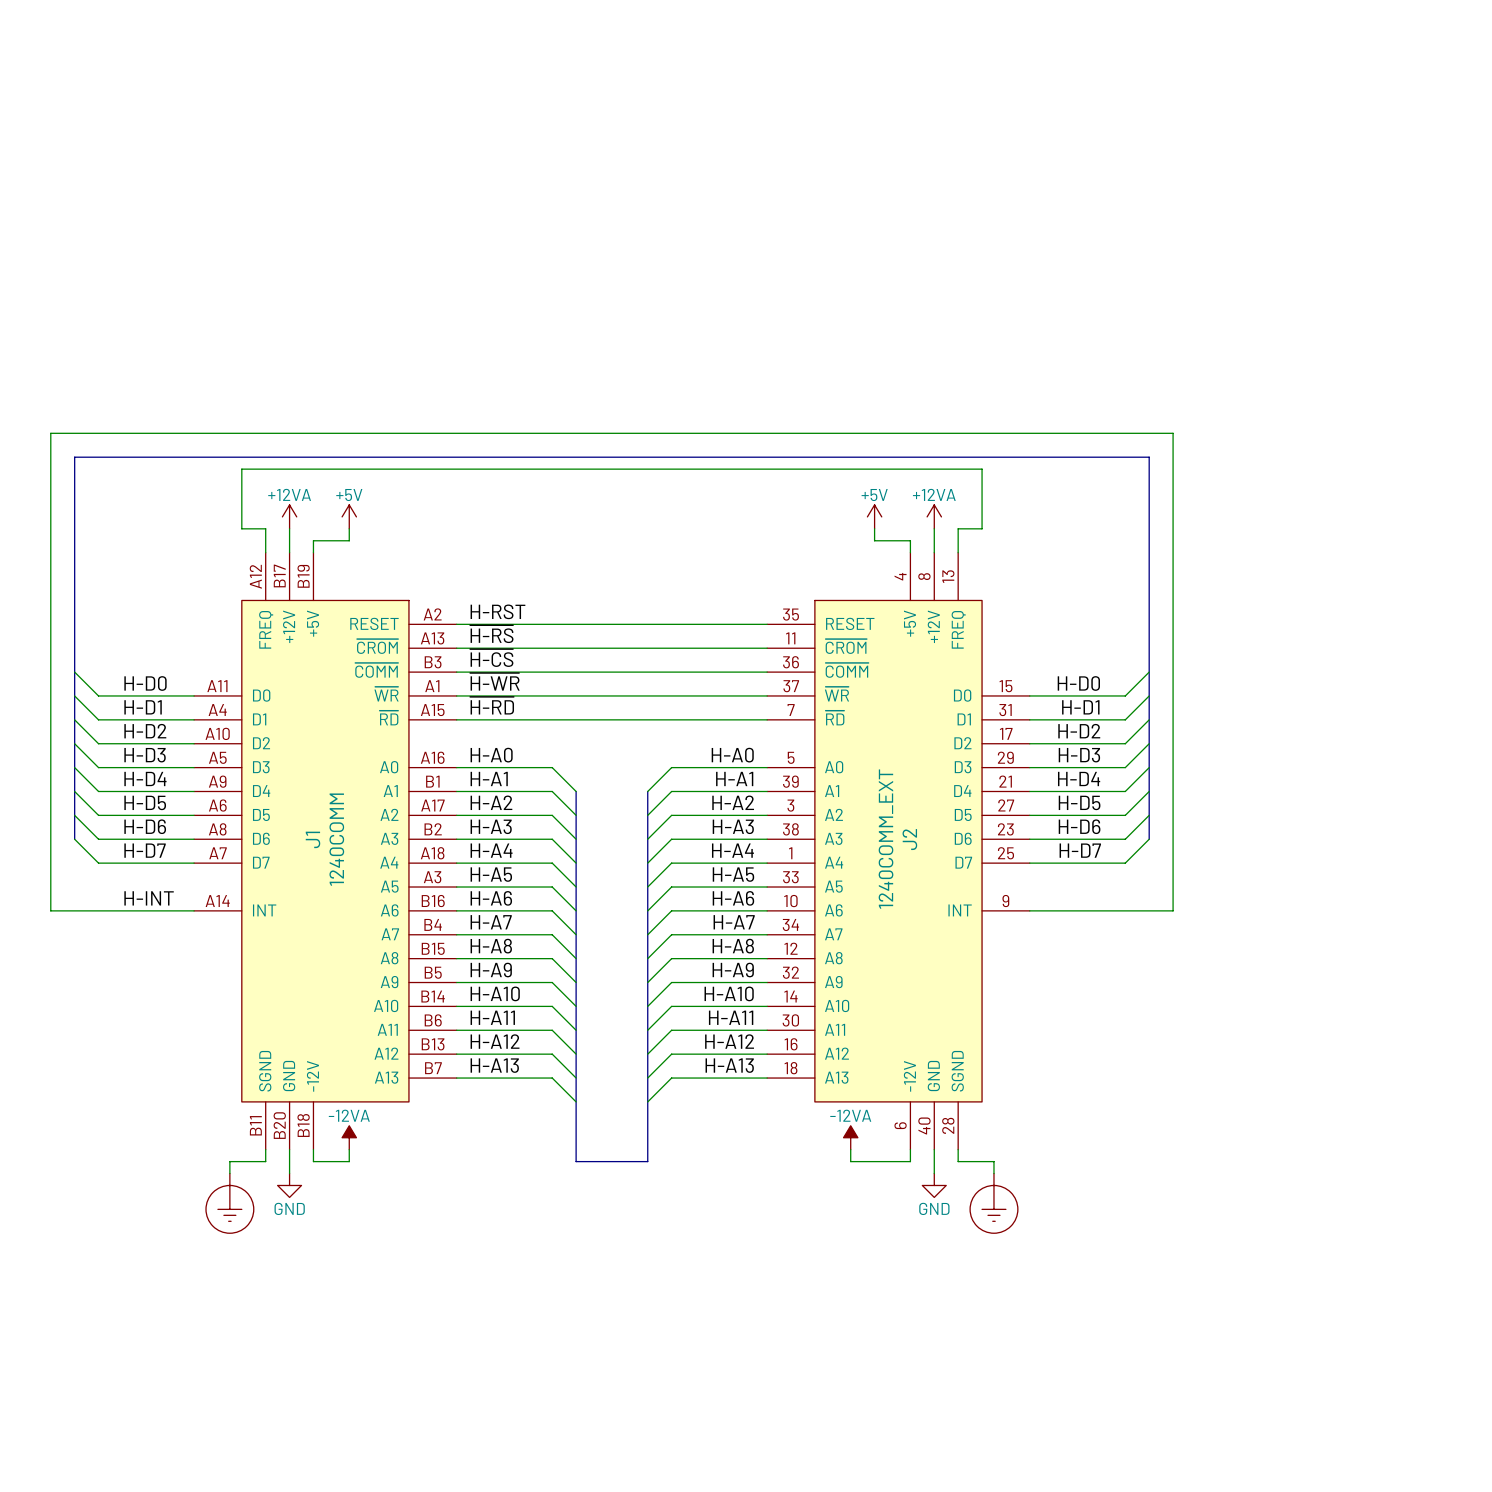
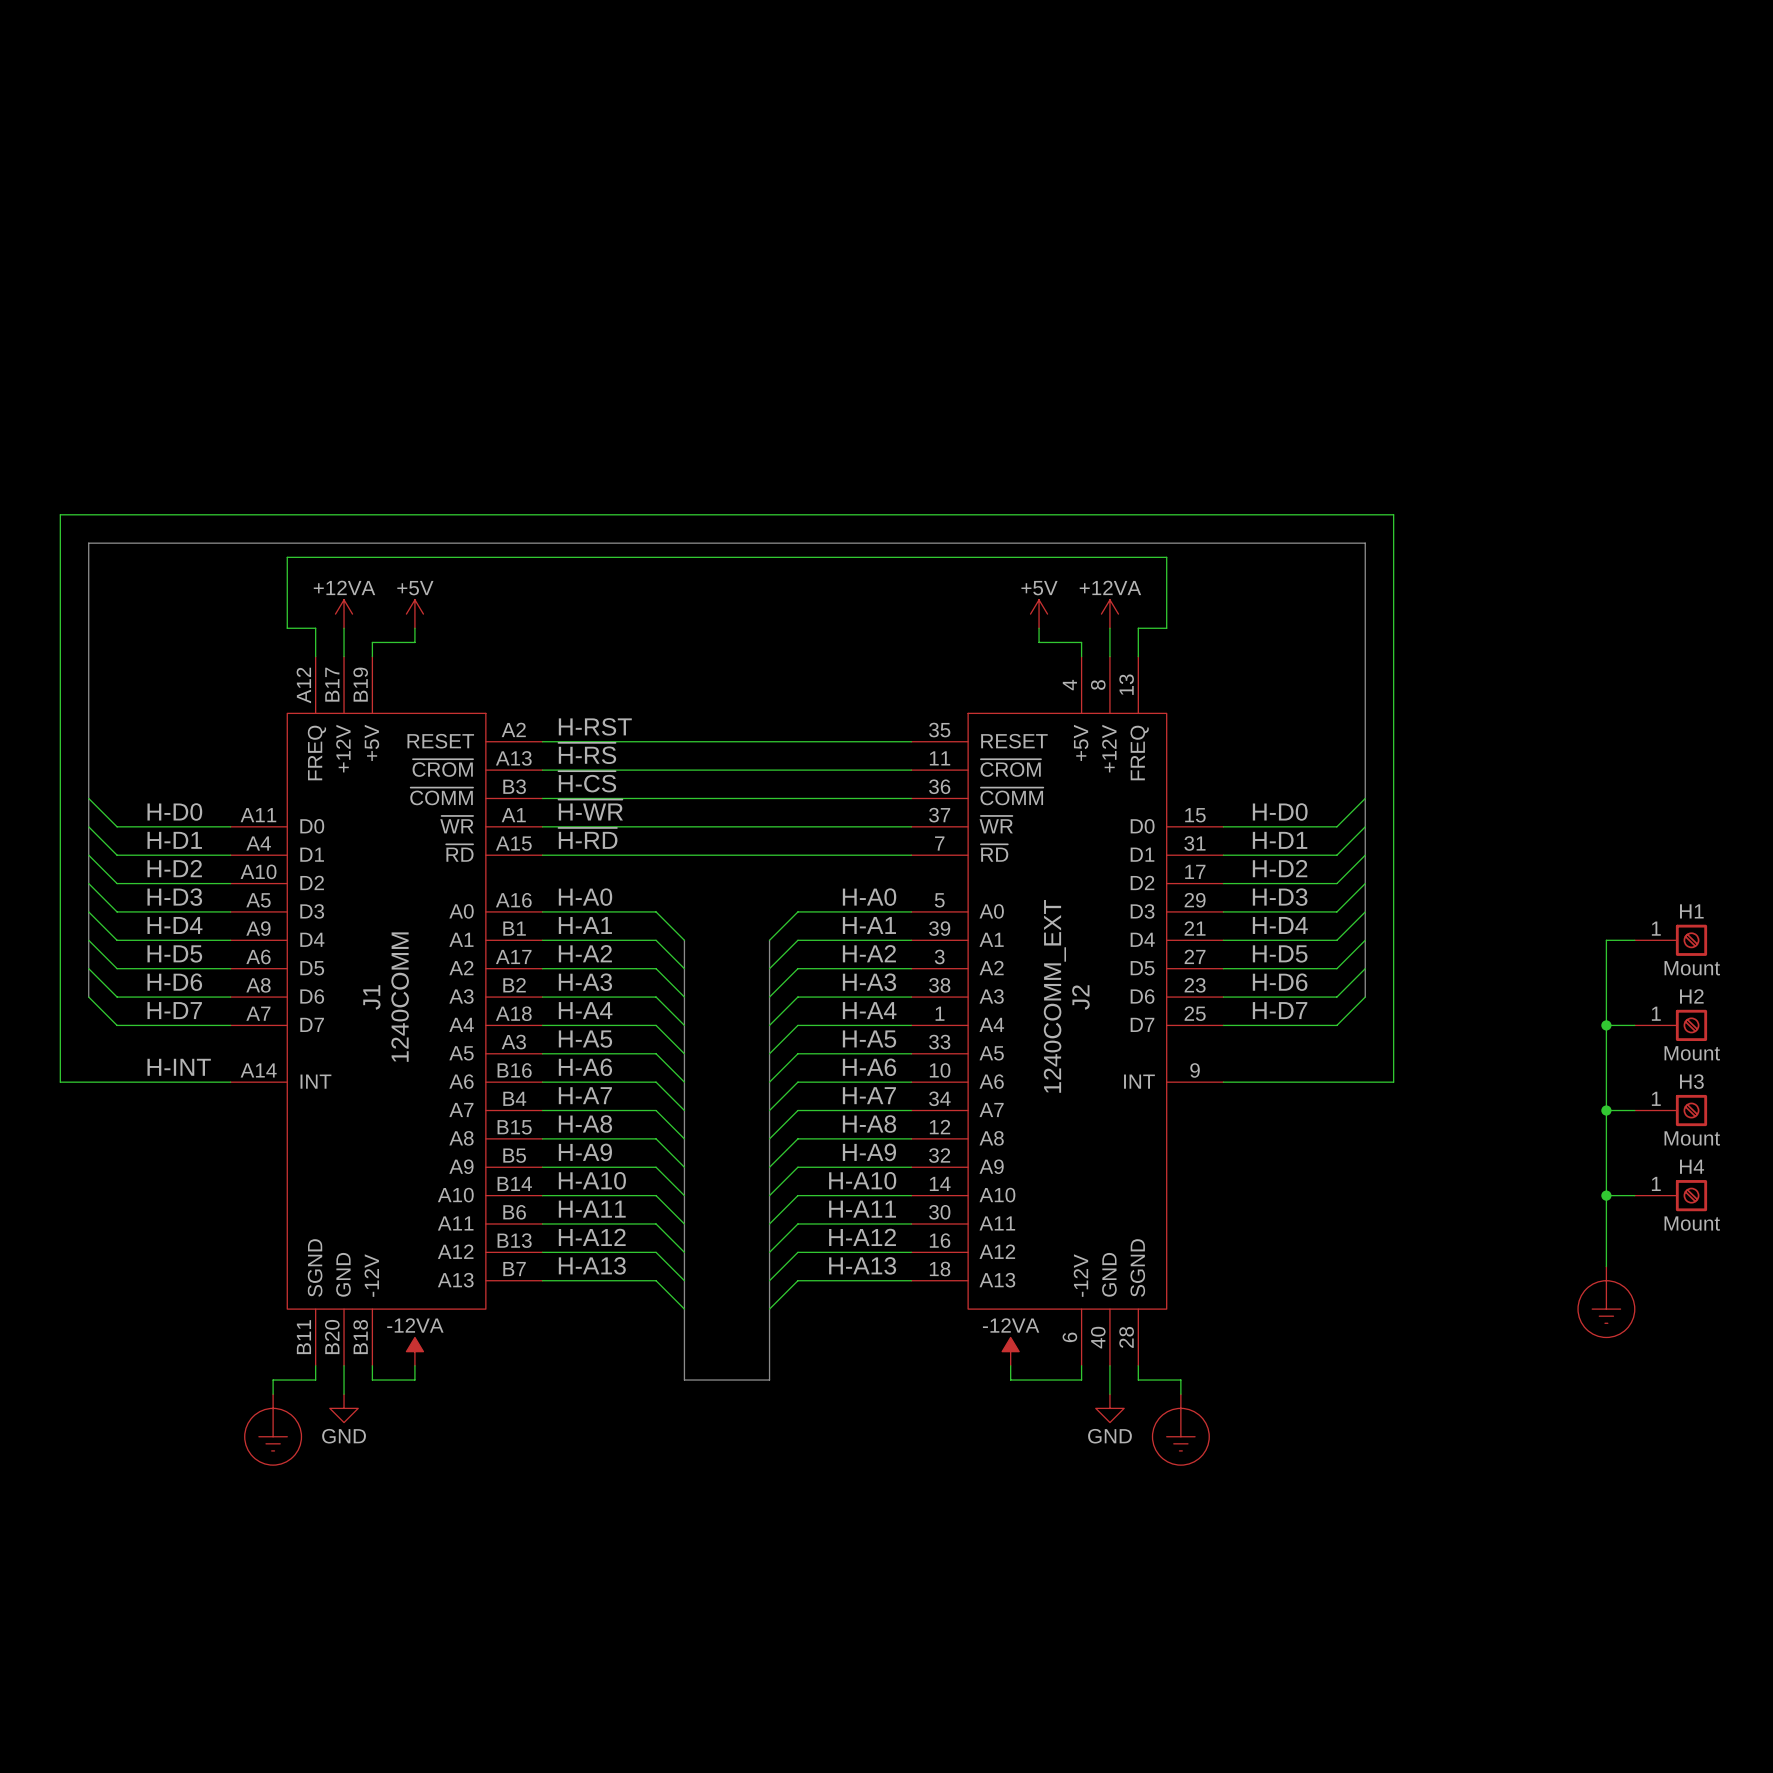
wire: none -> (1634, 940) (1606, 940) (1606, 1266)
H1: none -> Mount (1670, 940)
wire: none -> (1606, 1025) (1634, 1025)
junction: none -> (1606, 1025)
H2: none -> Mount (1670, 1025)
wire: none -> (1606, 1110) (1634, 1110)
junction: none -> (1606, 1110)
H3: none -> Mount (1670, 1110)
wire: none -> (1606, 1195) (1634, 1195)
junction: none -> (1606, 1195)
H4: none -> Mount (1670, 1195)
power symbol: none -> (1606, 1302)

